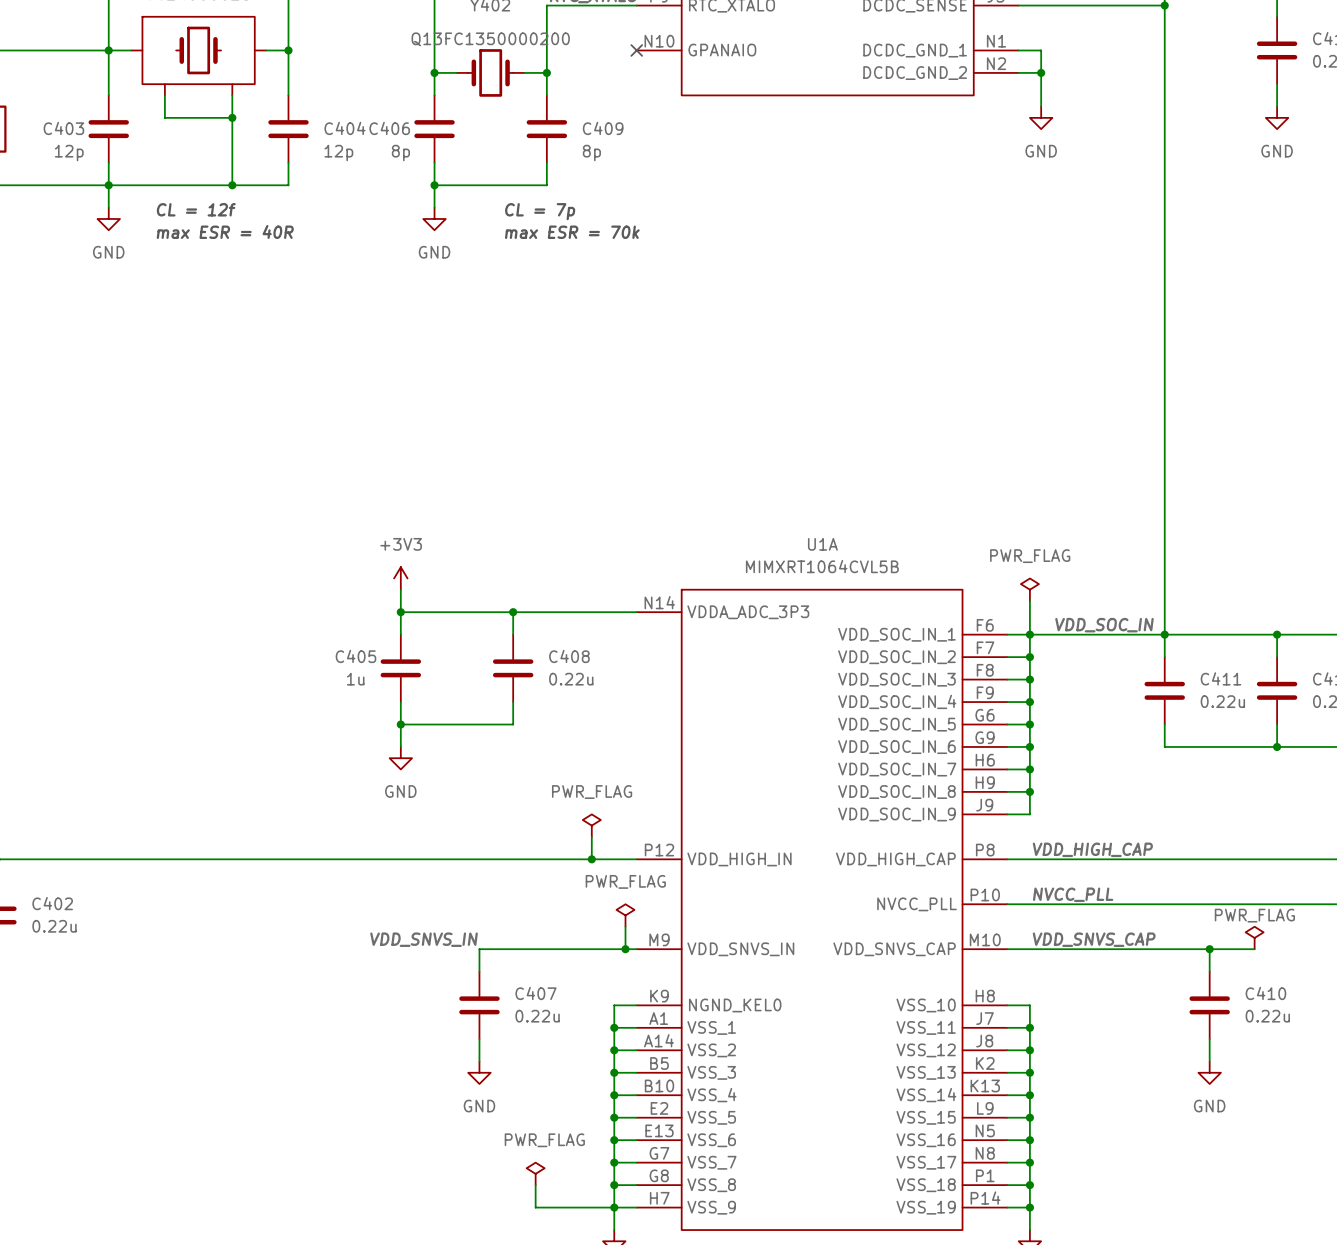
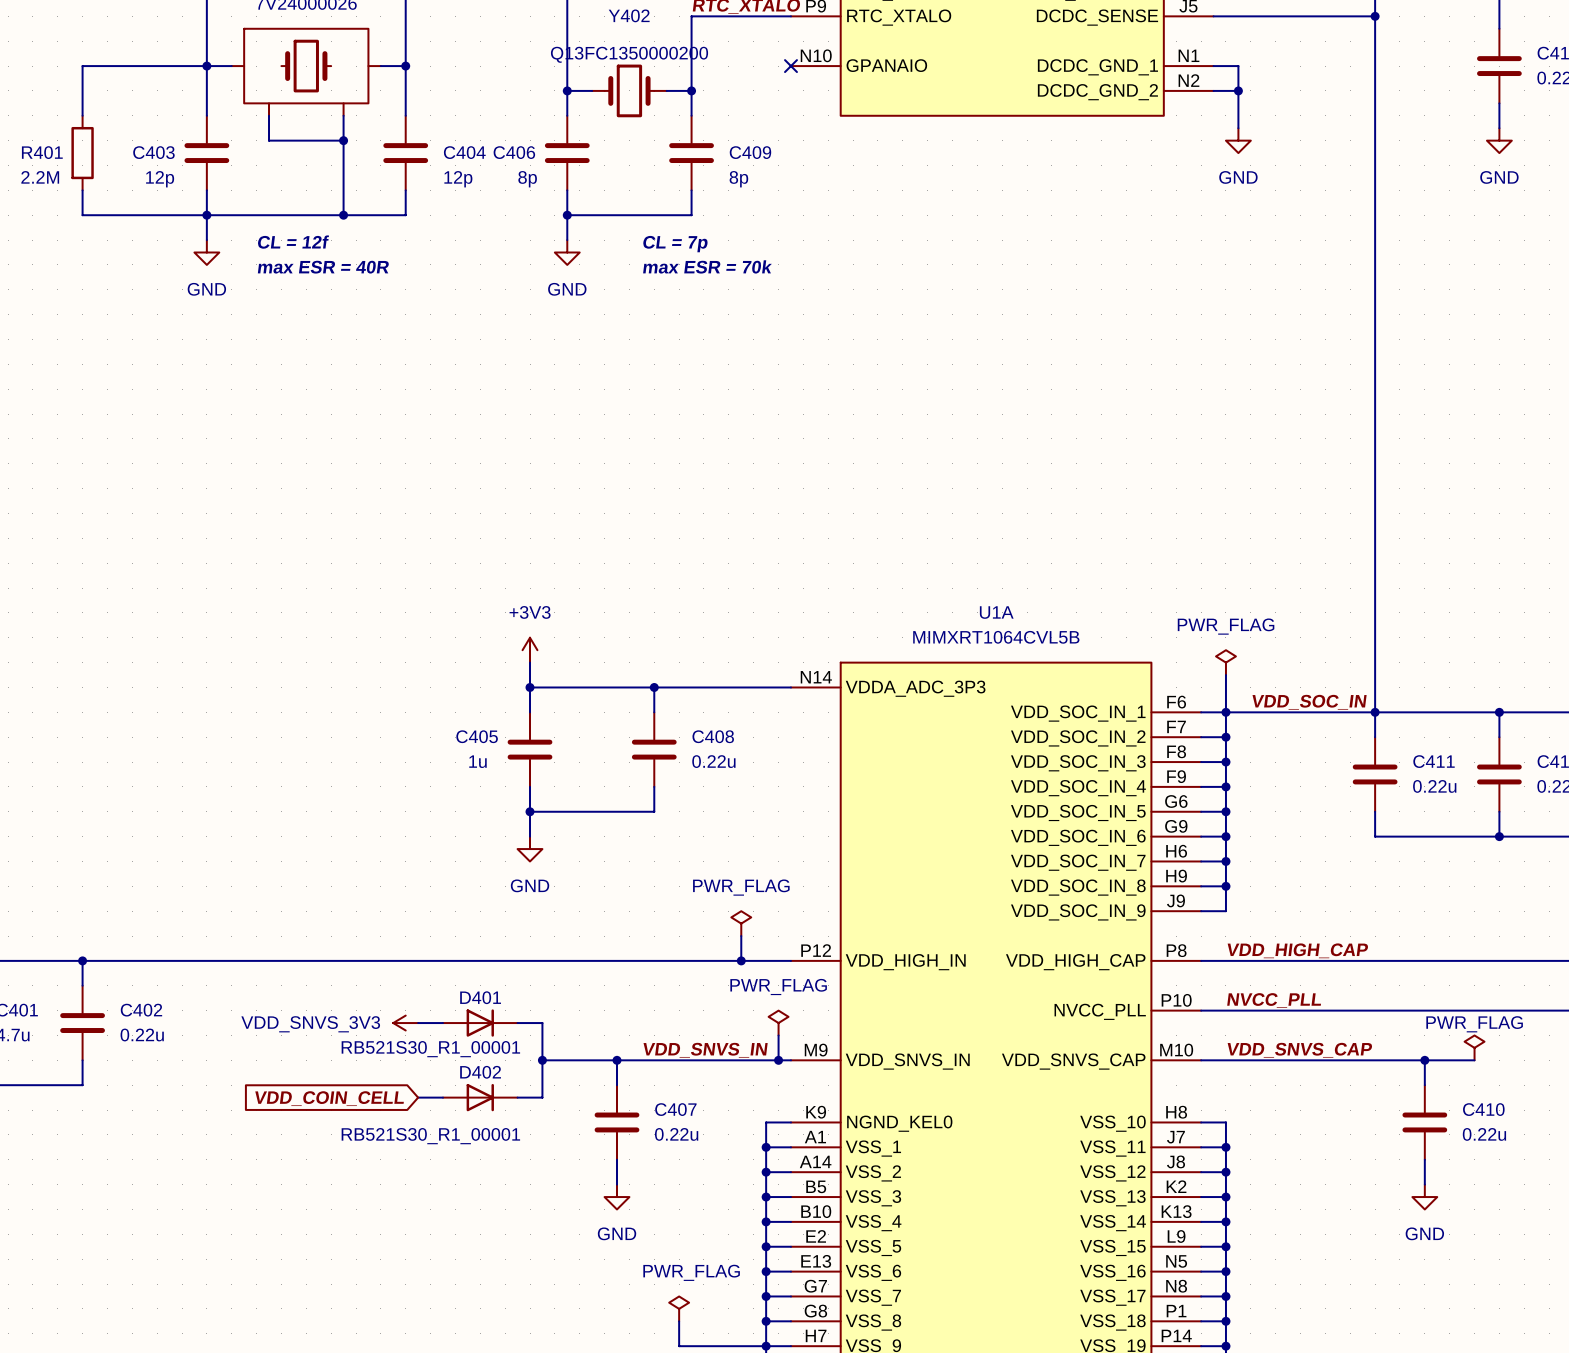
power symbol: none -> VDD_SNVS_3V3 (405, 1023)
wire: none -> (418, 1023) (443, 1023)
D401: none -> RB521S30_R1_00001 (480, 1023)
wire: none -> (517, 1023) (542, 1023) (542, 1097) (517, 1097)
label position: VDD_SNVS_IN (424, 939) -> VDD_SNVS_IN (705, 1050)
wire: none -> (542, 1060) (616, 1060)
junction: none -> (542, 1060)
junction: none -> (616, 1060)
wire: none -> (418, 1097) (443, 1097)
D402: none -> RB521S30_R1_00001 (480, 1097)
global label: none -> VDD_COIN_CELL (329, 1098)

